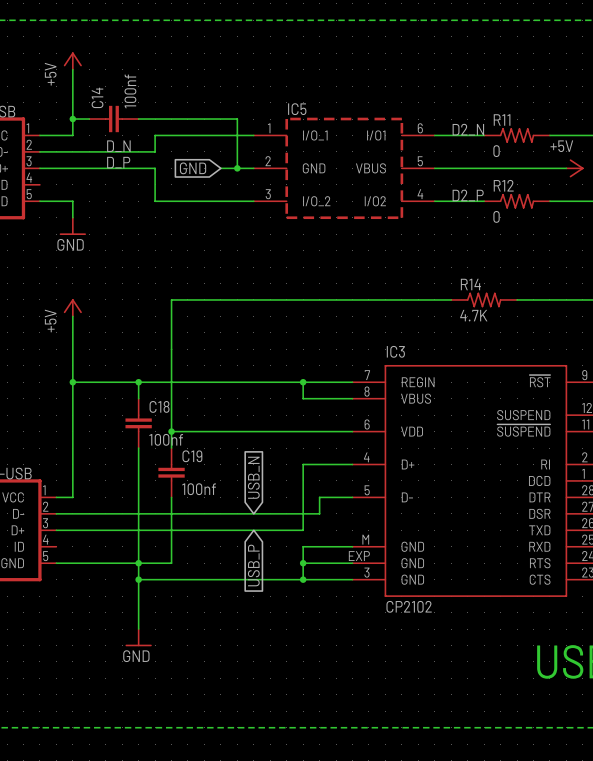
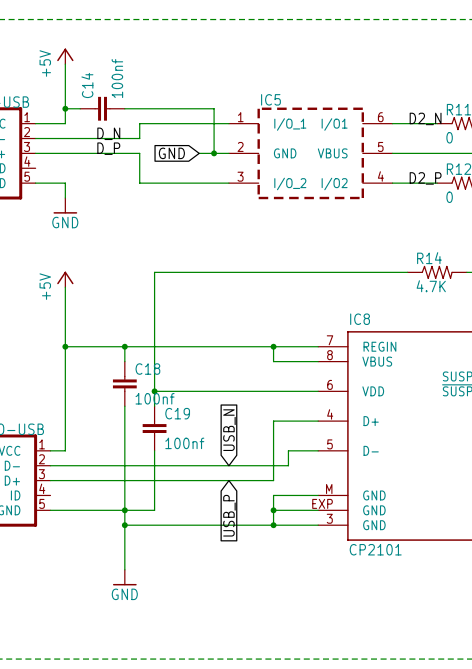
IC3 name: IC3 (395, 351) -> IC8 (360, 319)
IC3 value: CP2102 (409, 606) -> CP2101 (375, 549)

